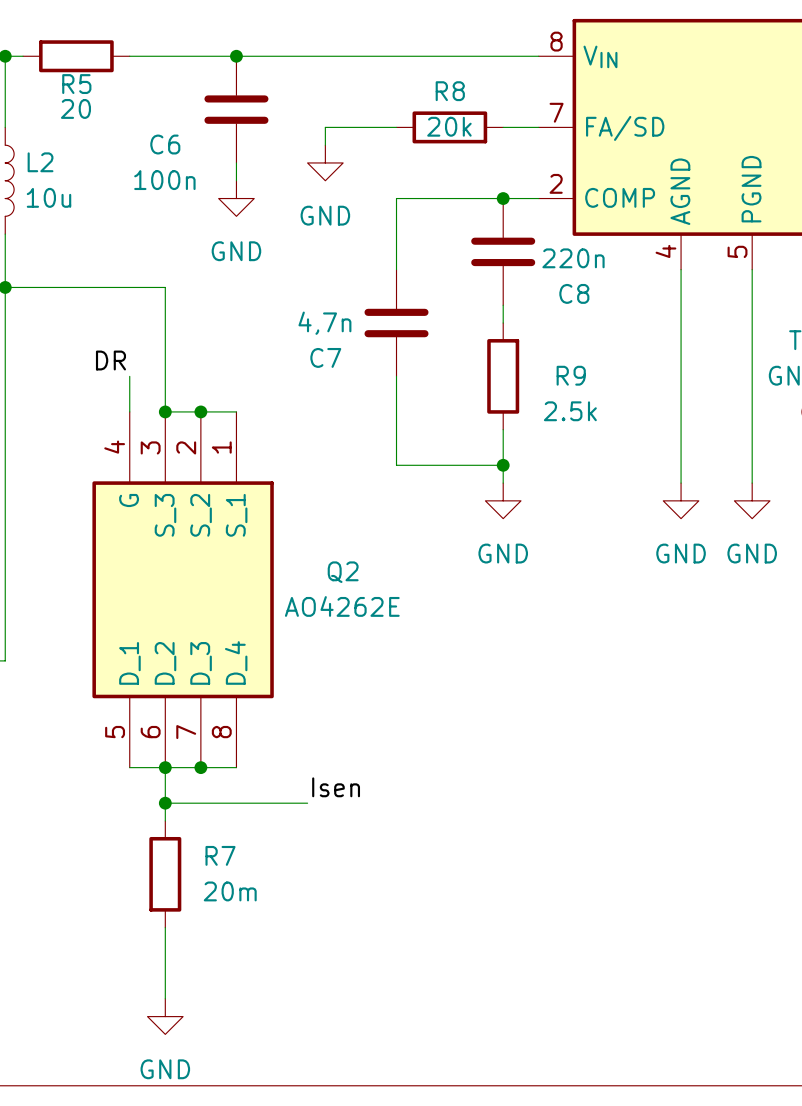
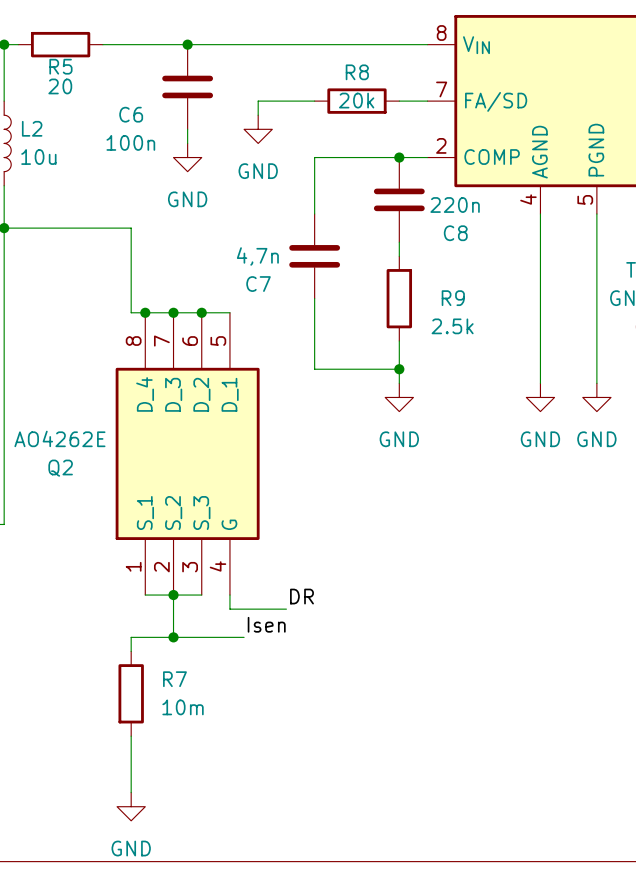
label: DR (110, 360) -> none
wire: (129, 376) (129, 411) -> none
wire: (165, 394) (165, 411) (236, 411) -> (131, 312) (229, 312)
junction: none -> (145, 312)
junction: none -> (173, 312)
junction: none -> (201, 312)
junction: (165, 411) -> none
junction: (200, 411) -> none
Q2 rotation: 0° (183, 589) -> 180° (187, 453)
wire: none -> (145, 595) (201, 595)
wire: none -> (173, 595) (173, 637)
junction: none -> (173, 595)
wire: none -> (229, 595) (229, 609) (286, 609)
label: none -> DR (301, 596)
wire: (129, 767) (236, 767) -> none
wire: (165, 767) (165, 803) -> none
junction: (165, 767) -> none
junction: (200, 767) -> none
junction: (165, 803) -> none
junction: none -> (173, 637)
R7 value: 20m (230, 891) -> 10m (183, 707)

